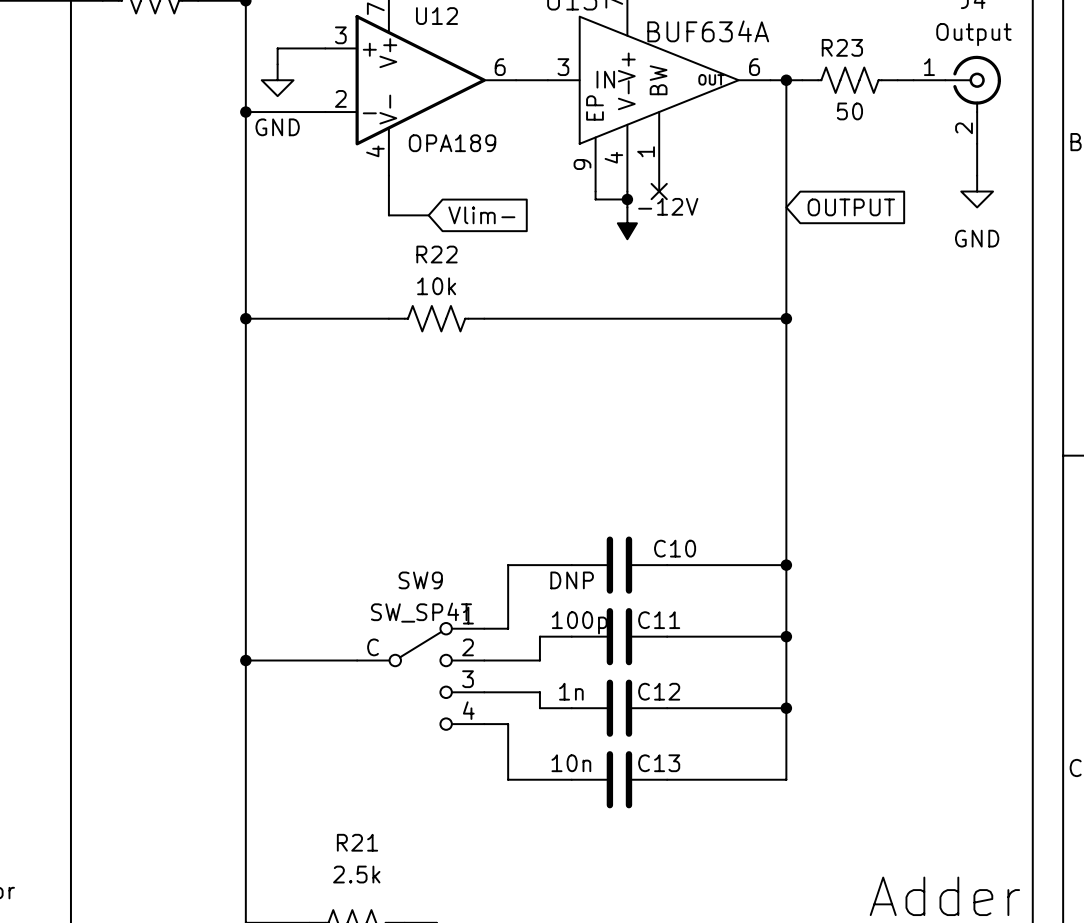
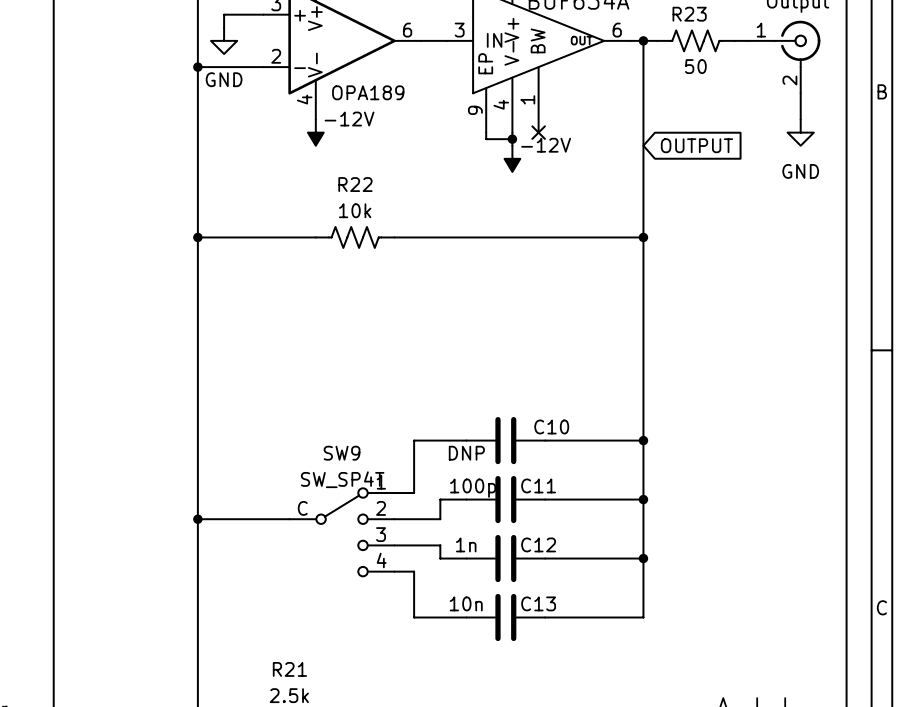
wire: (388, 175) (388, 215) (428, 215) -> none
power symbol: none -> -12V (315, 132)
global label: Vlim- (481, 215) -> none

